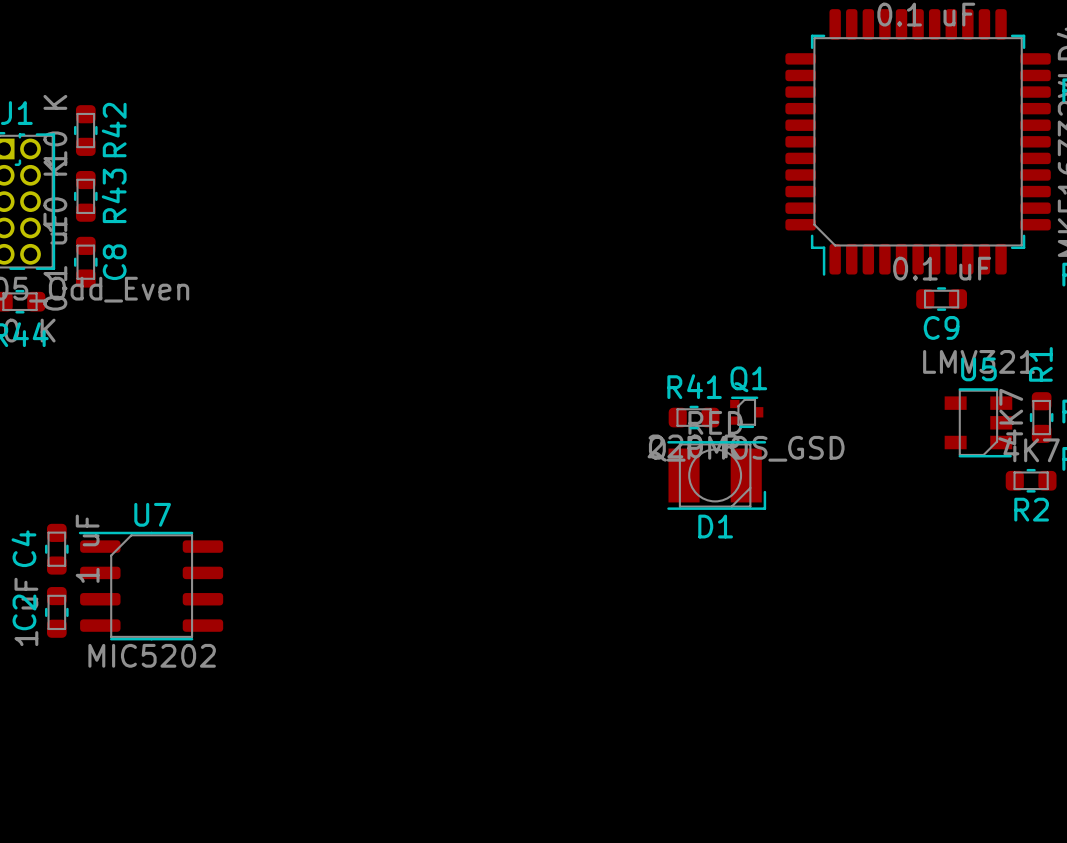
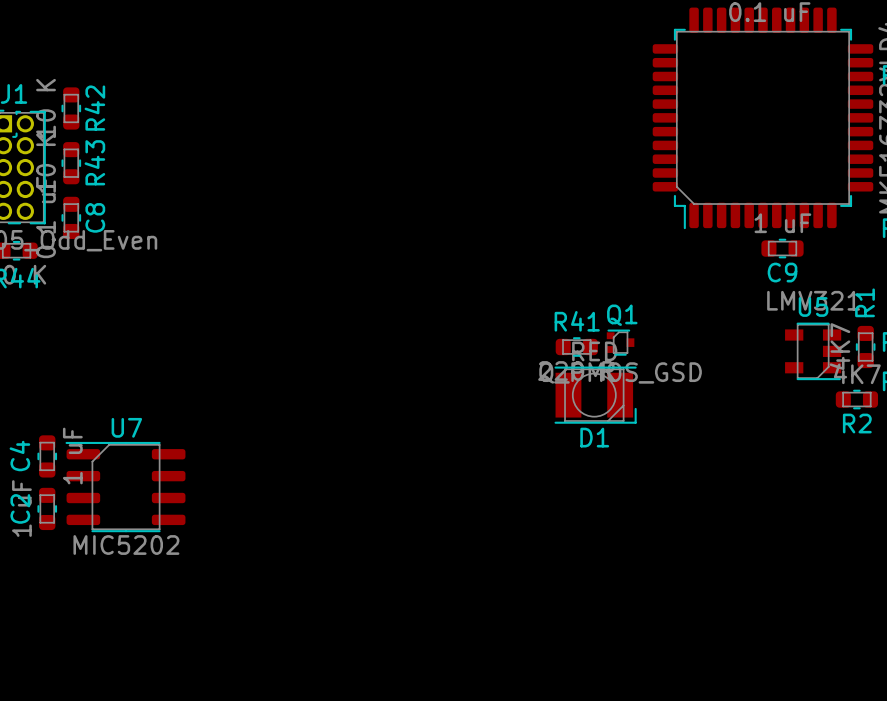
C9 value: 0.1 uF (942, 268) -> 1 uF (782, 223)

